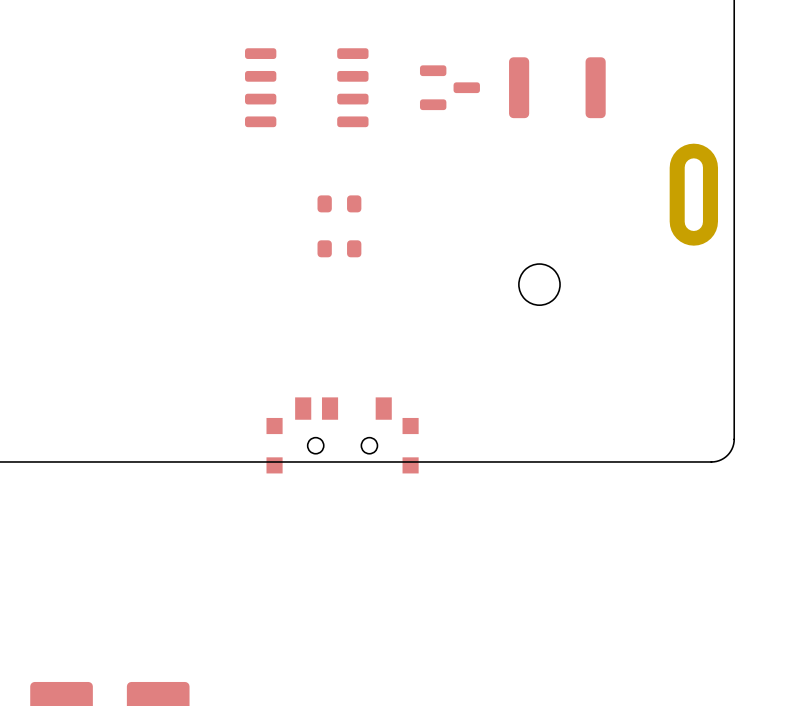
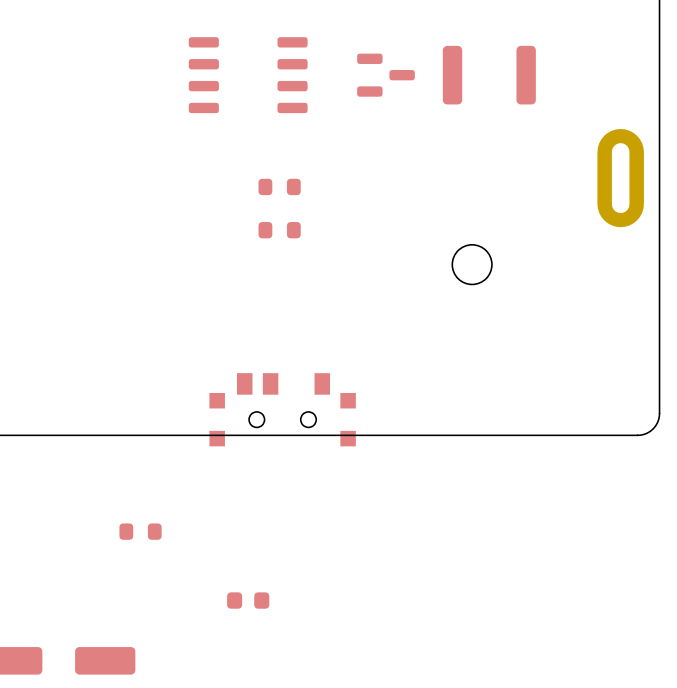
part: none -> (140, 531)
part: none -> (248, 600)

